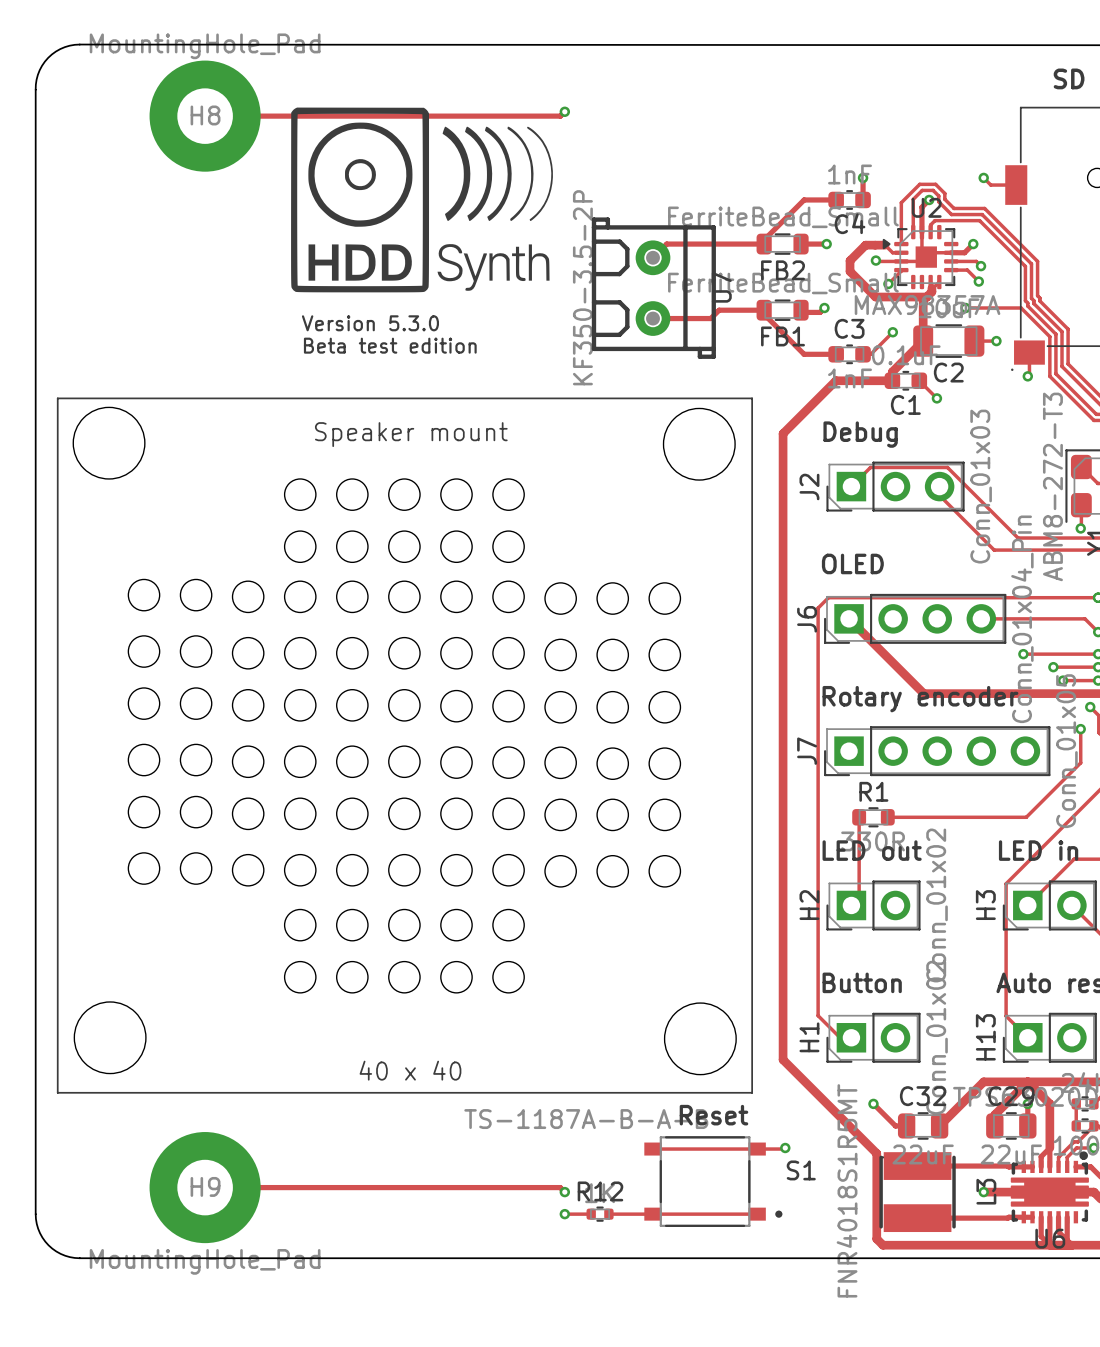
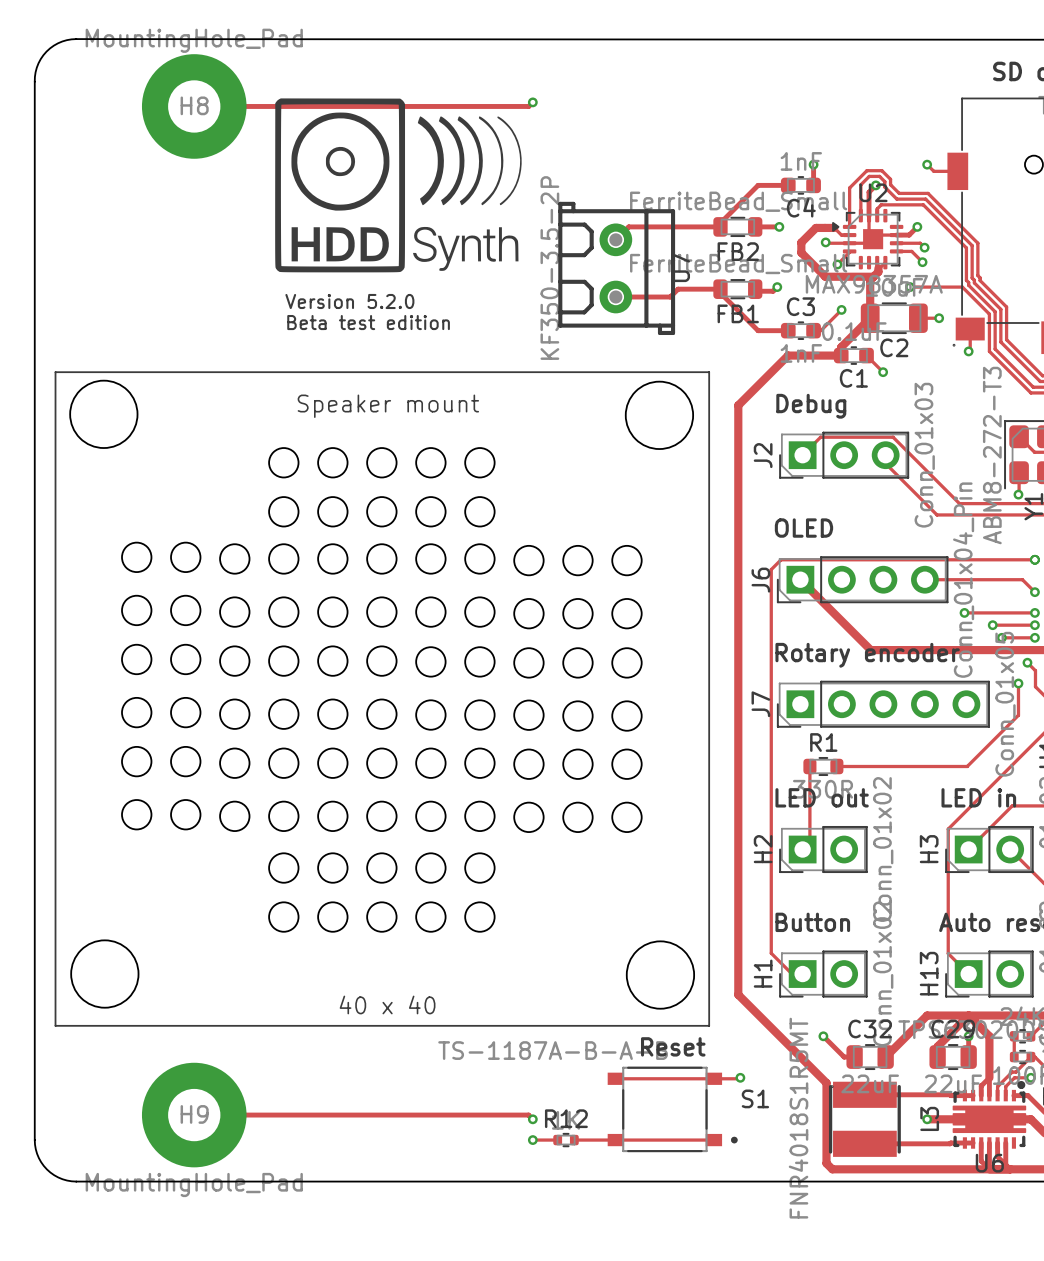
text: Version 5.3.0 (370, 323) -> Version 5.2.0 (349, 301)

